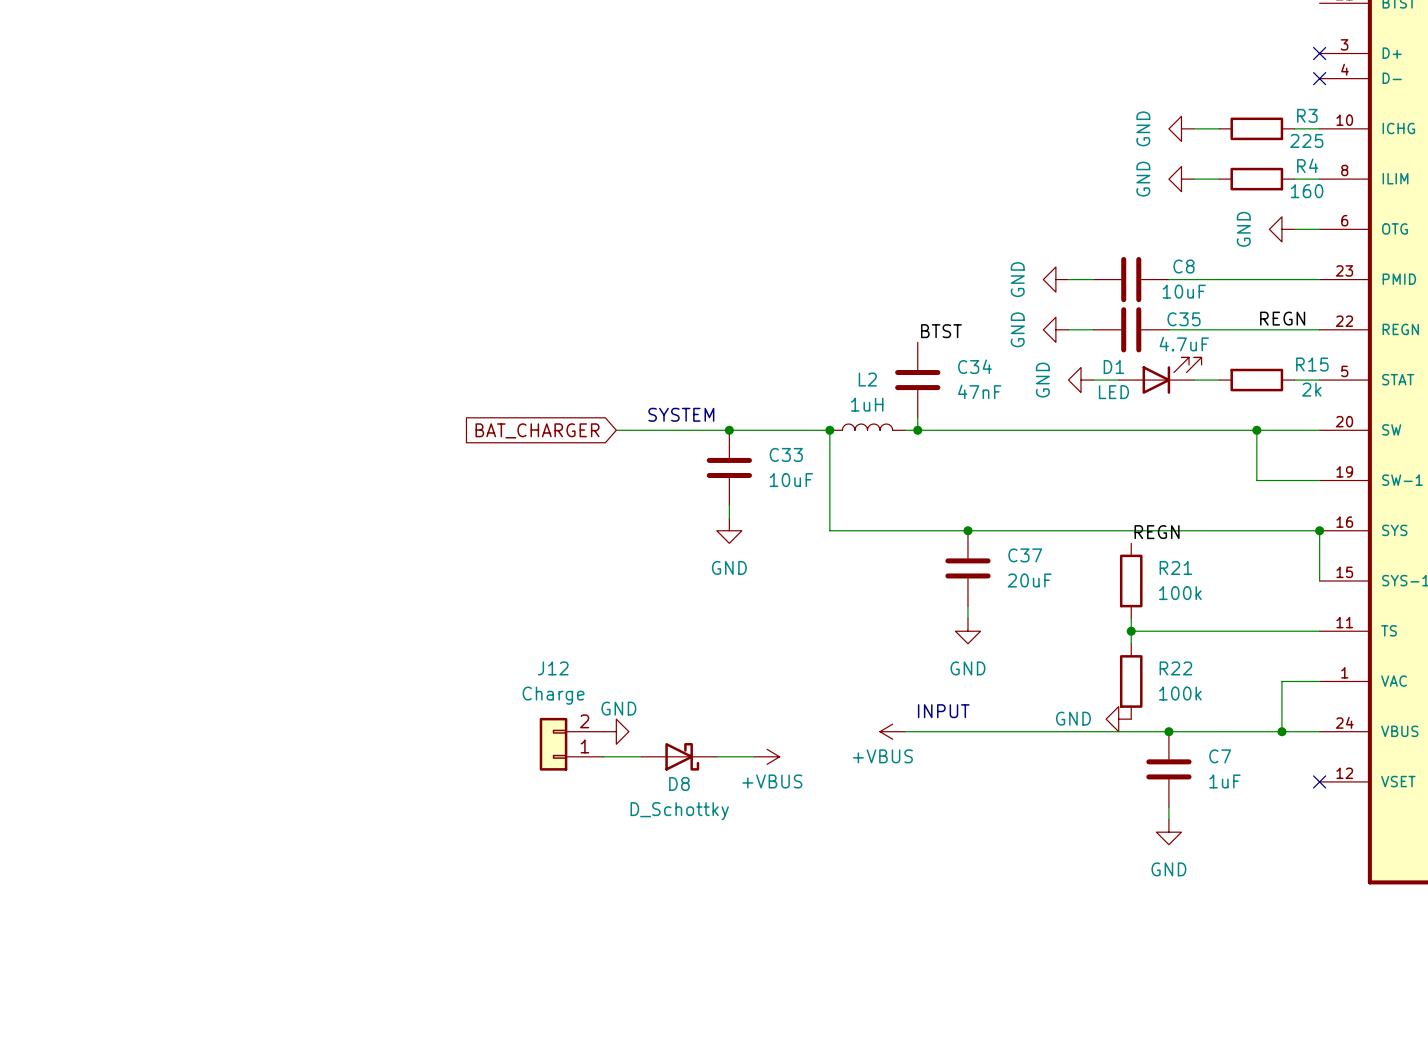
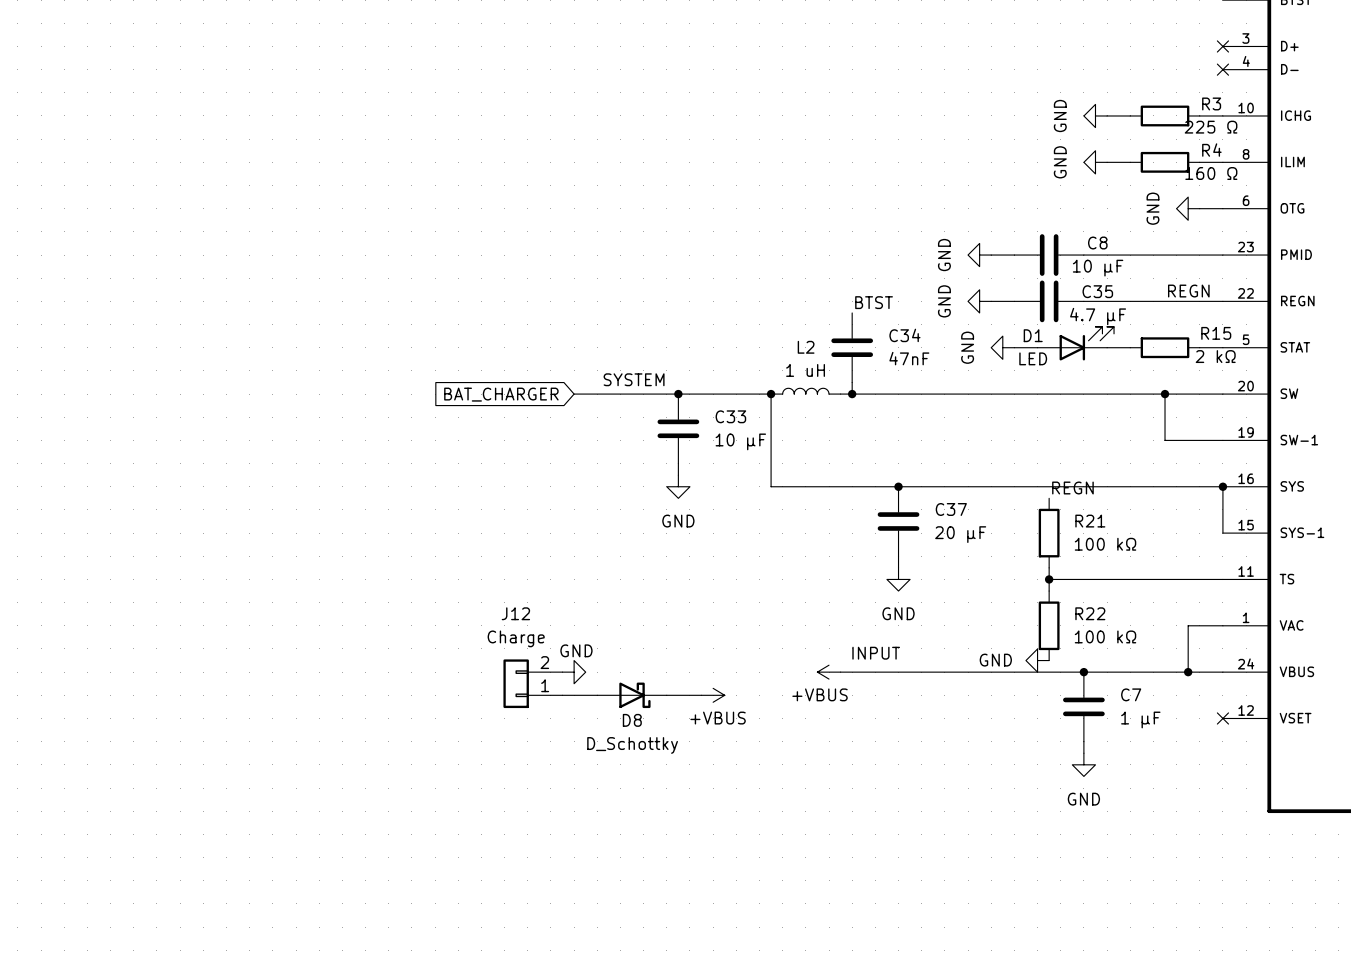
R3 value: 225 (1306, 140) -> 225 Ω (1211, 127)
R4 value: 160 (1307, 191) -> 160 Ω (1211, 173)
C8 value: 10uF (1184, 291) -> 10 µF (1098, 268)
C35 value: 4.7uF (1184, 344) -> 4.7 µF (1098, 316)
R15 value: 2k (1311, 389) -> 2 kΩ (1215, 356)
L2 value: 1uH (867, 404) -> 1 uH (805, 370)
C33 value: 10uF (791, 480) -> 10 µF (740, 441)
C37 value: 20uF (1029, 580) -> 20 µF (960, 534)
R21 value: 100k (1180, 593) -> 100 kΩ (1105, 544)
R22 value: 100k (1180, 693) -> 100 kΩ (1105, 636)
C7 value: 1uF (1224, 781) -> 1 µF (1140, 719)

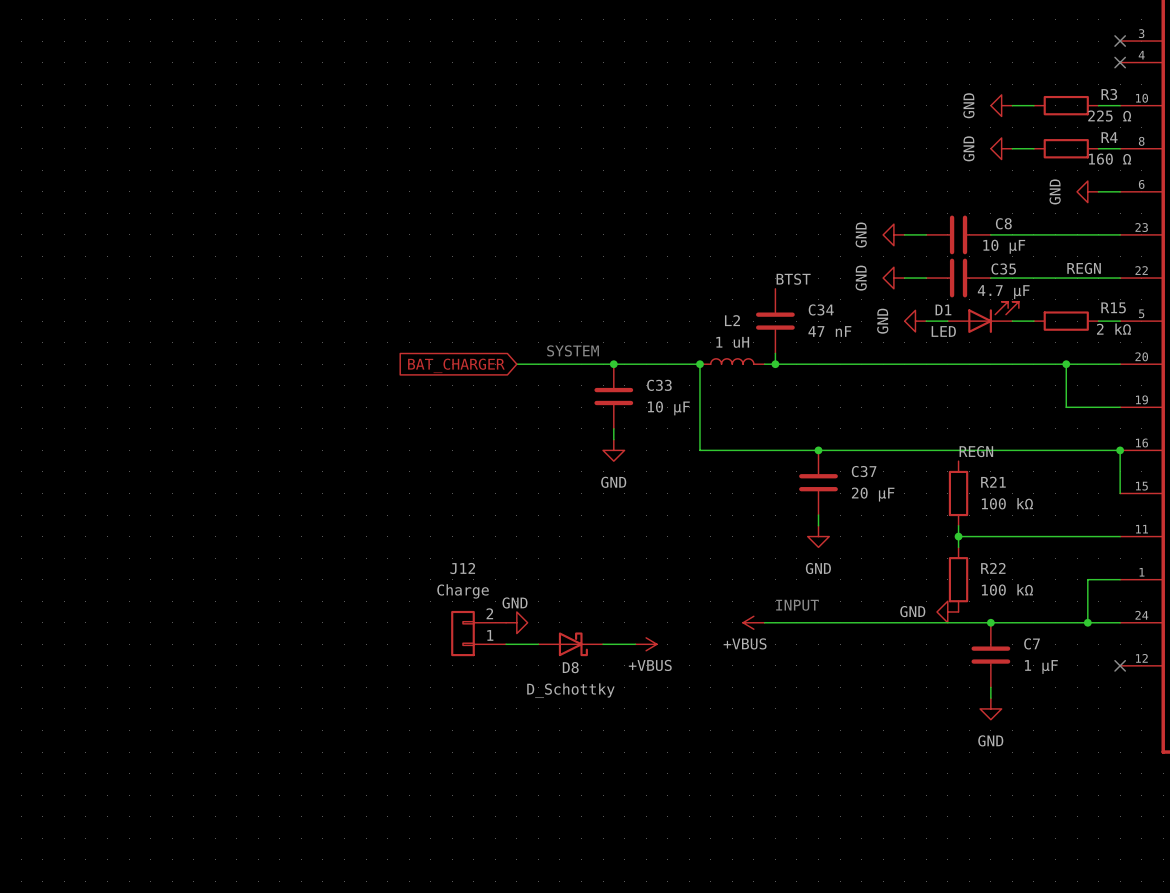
C34 value: 47nF (909, 358) -> 47 nF (829, 331)

